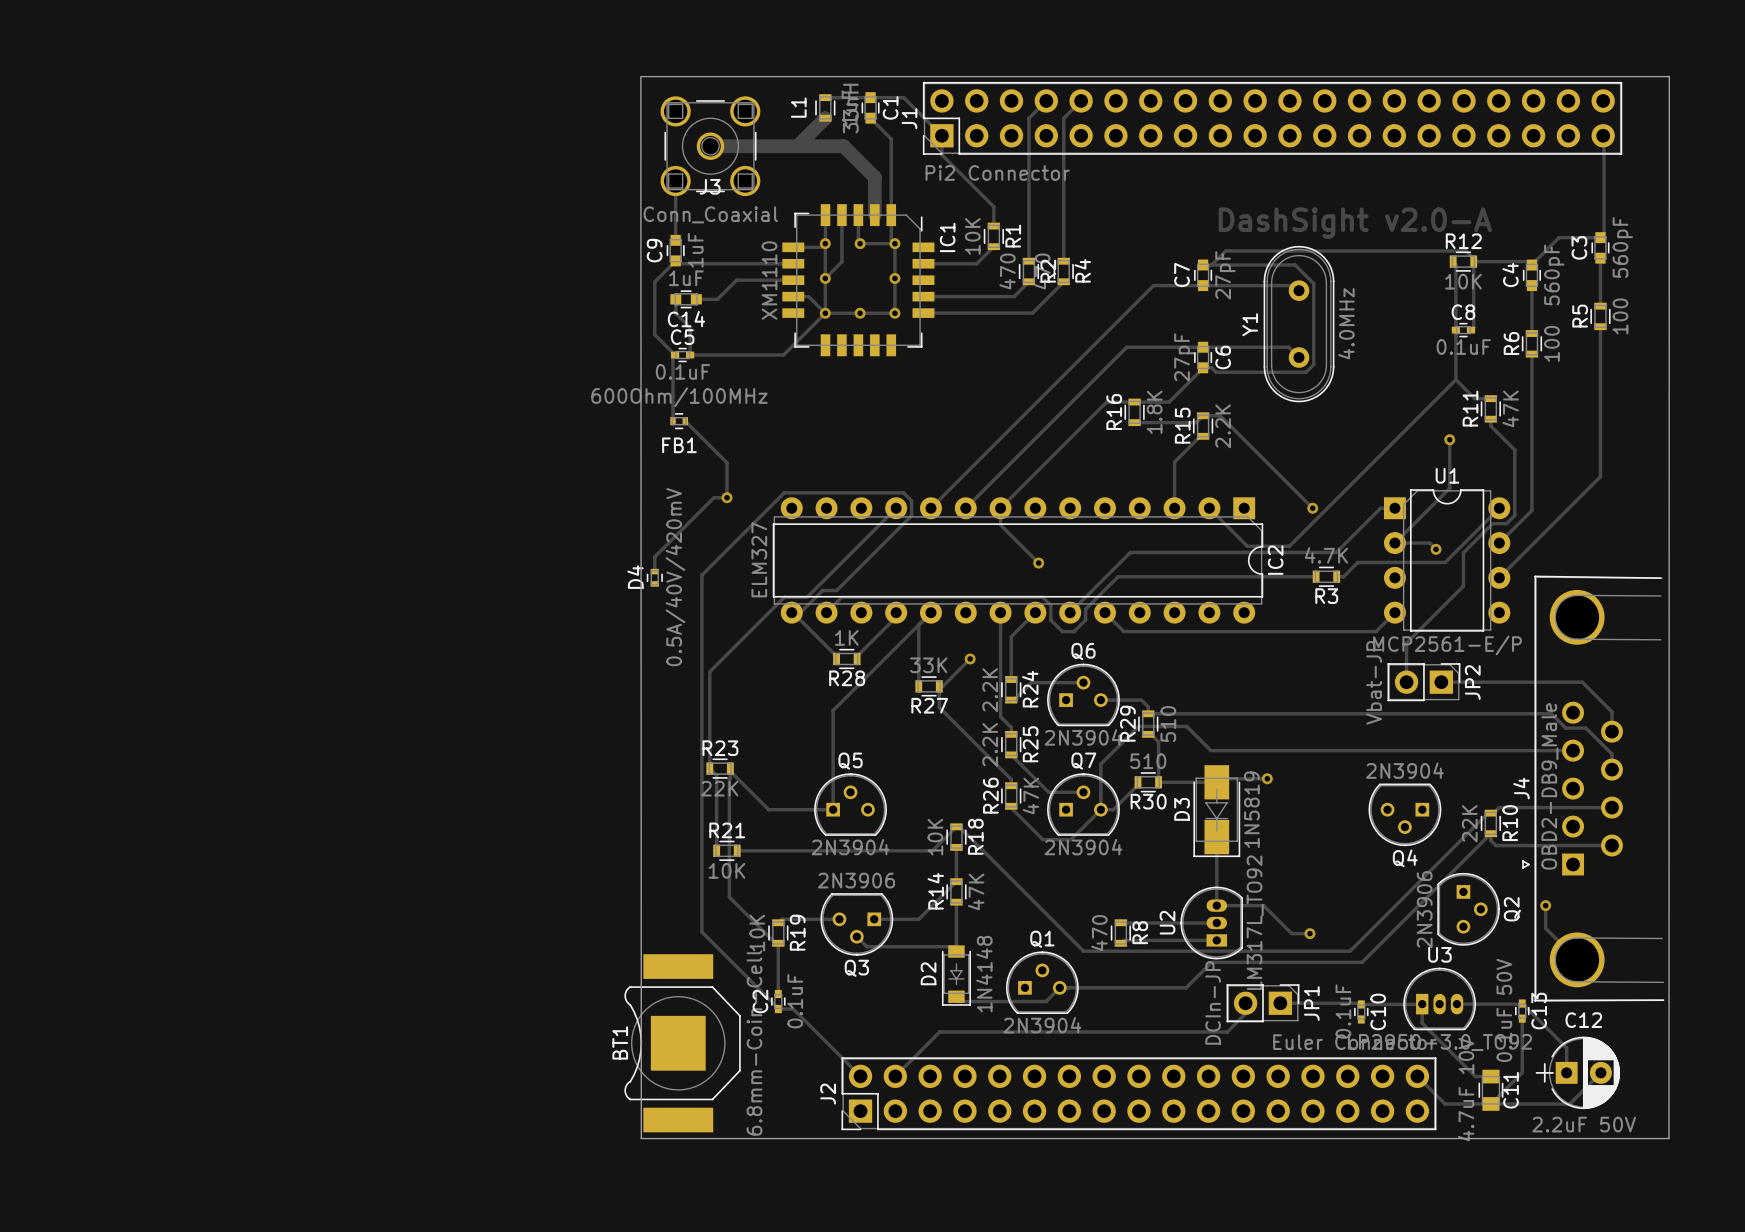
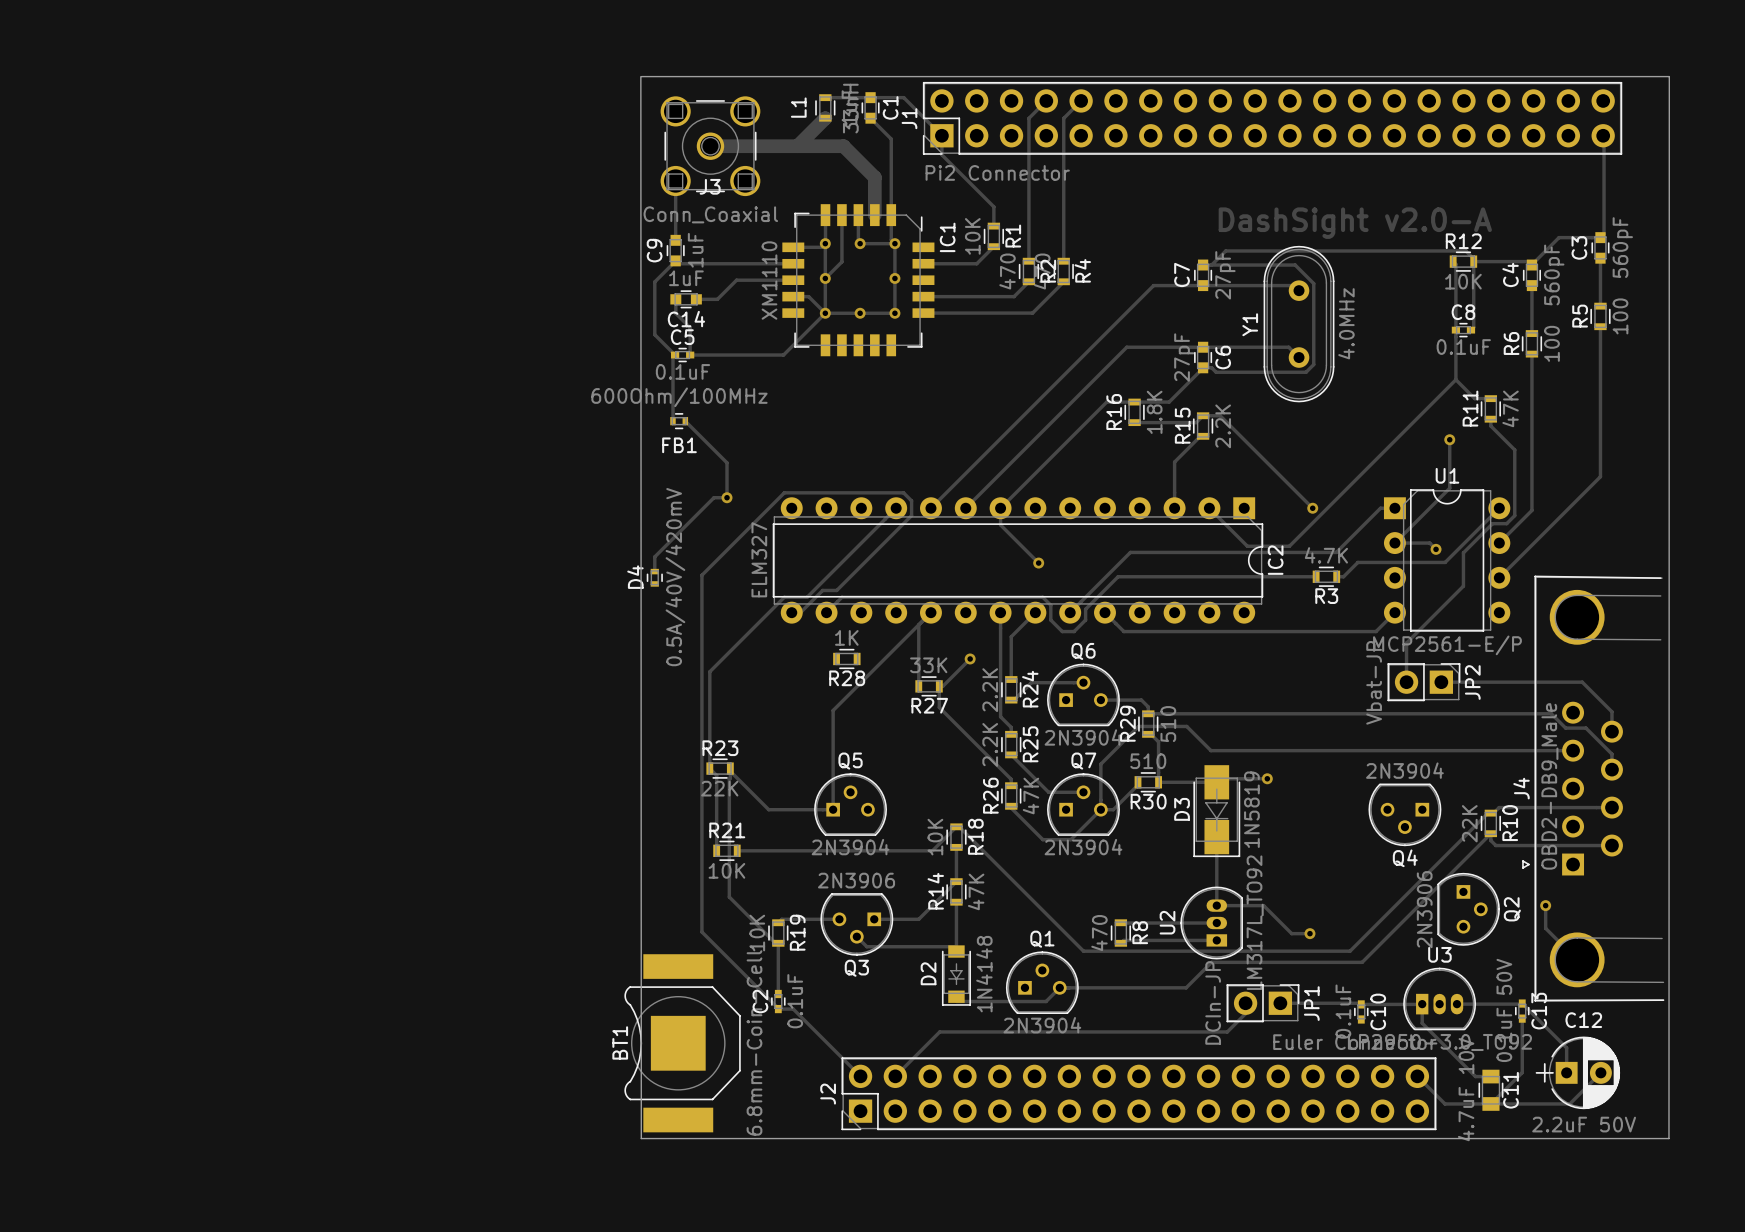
track: (792, 612) (836, 656) (836, 658) -> none
track: (896, 612) (896, 617) (857, 656) (857, 658) -> none

